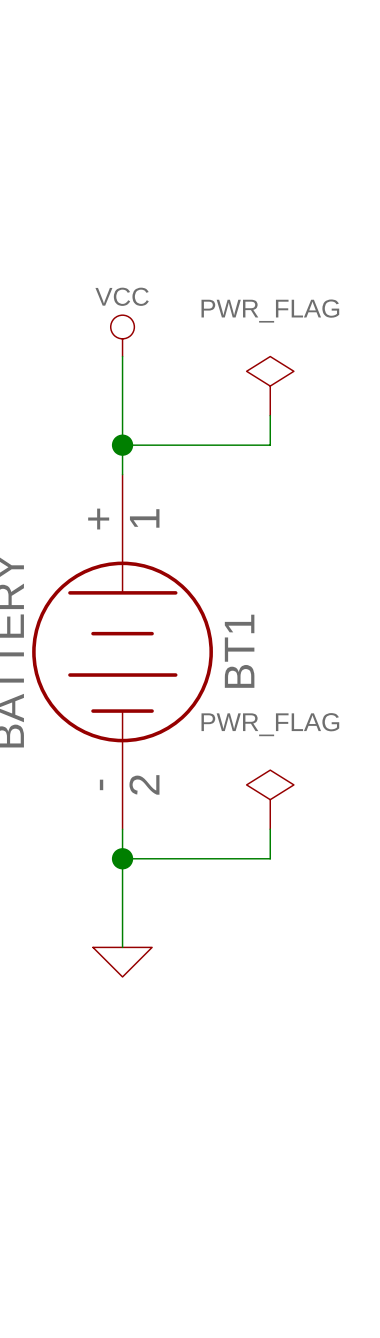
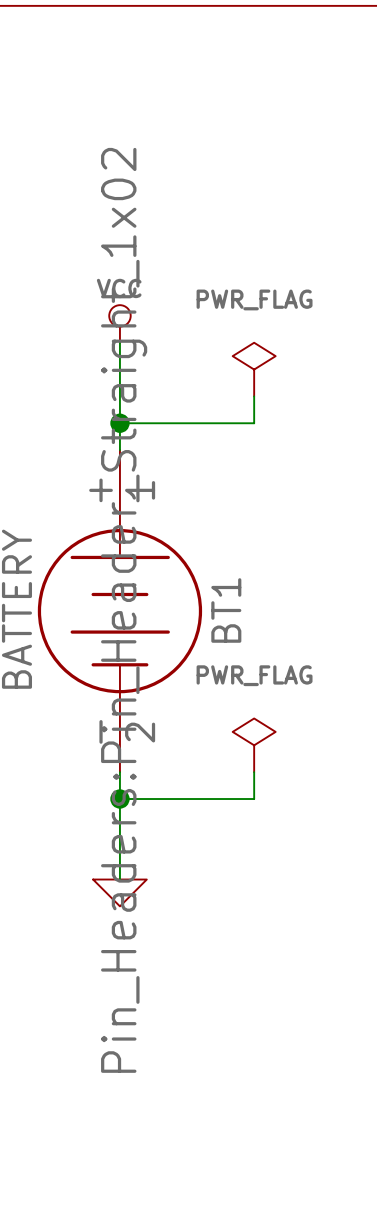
BT1 text: none -> Pin_Headers:Pin_Header_Straight_1x02 (124, 610)

